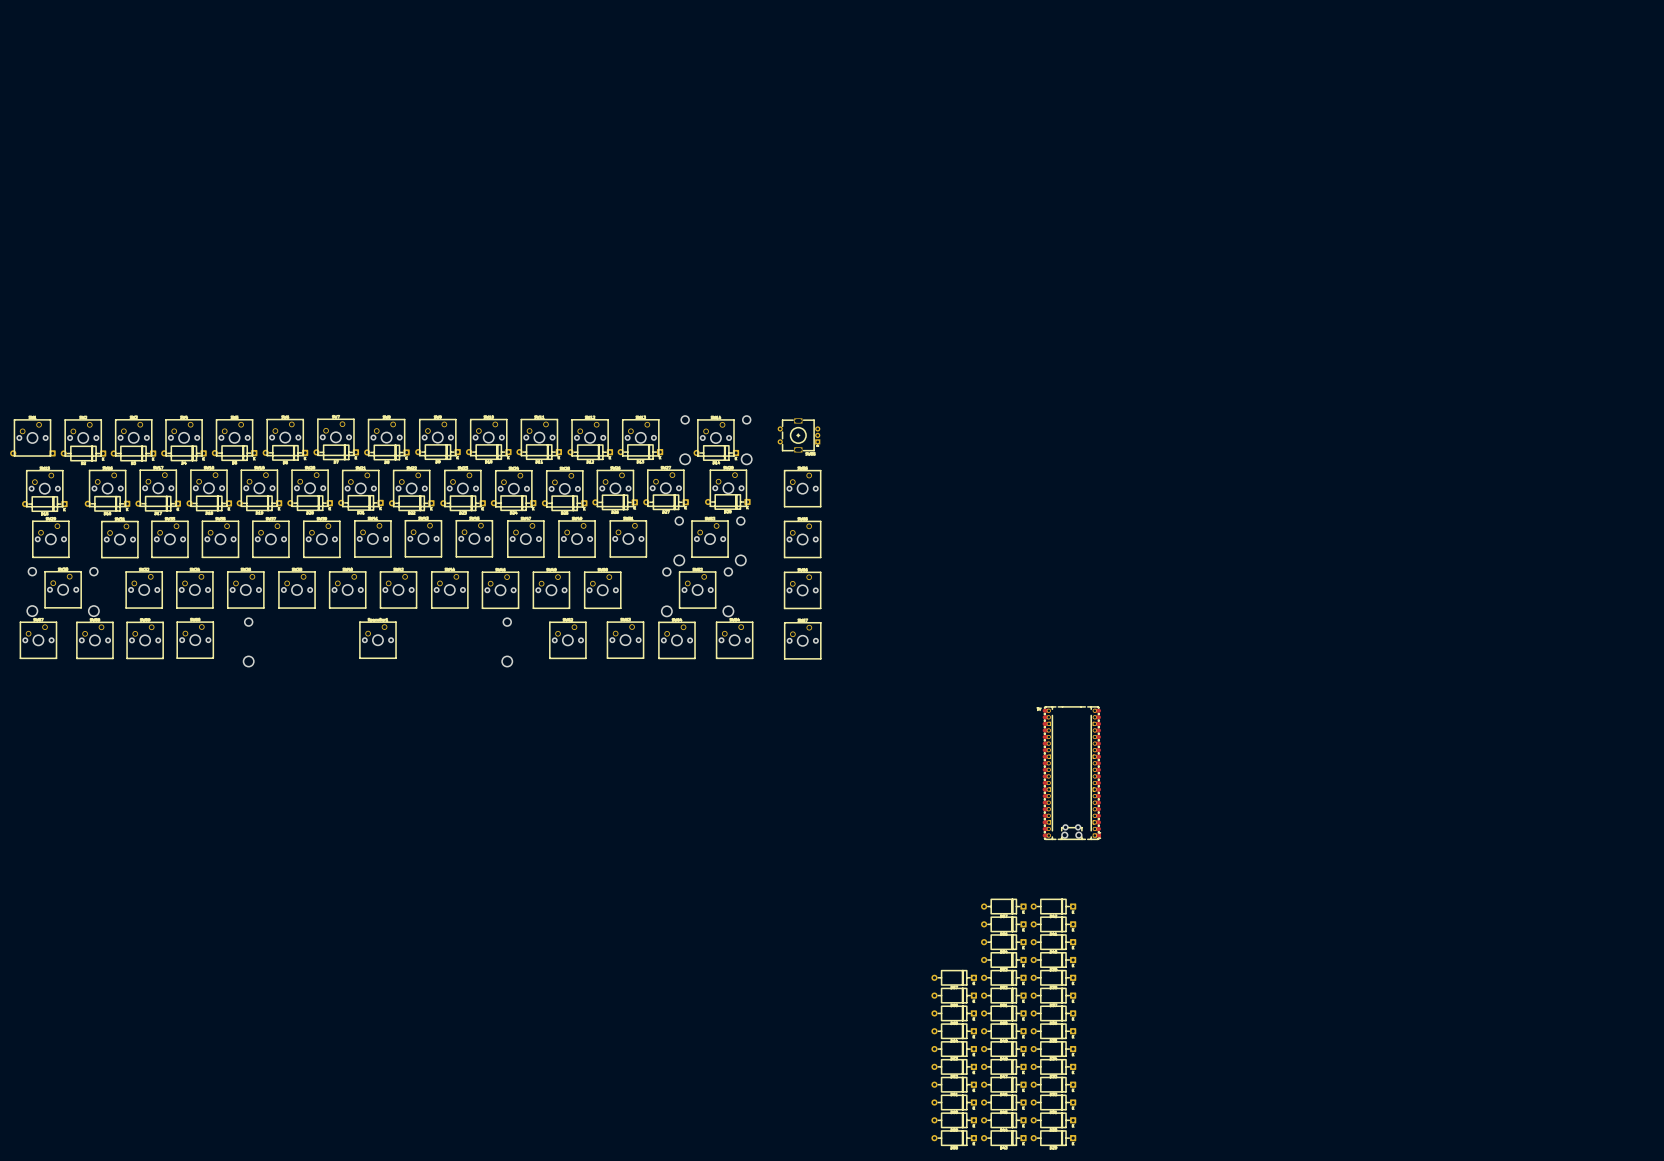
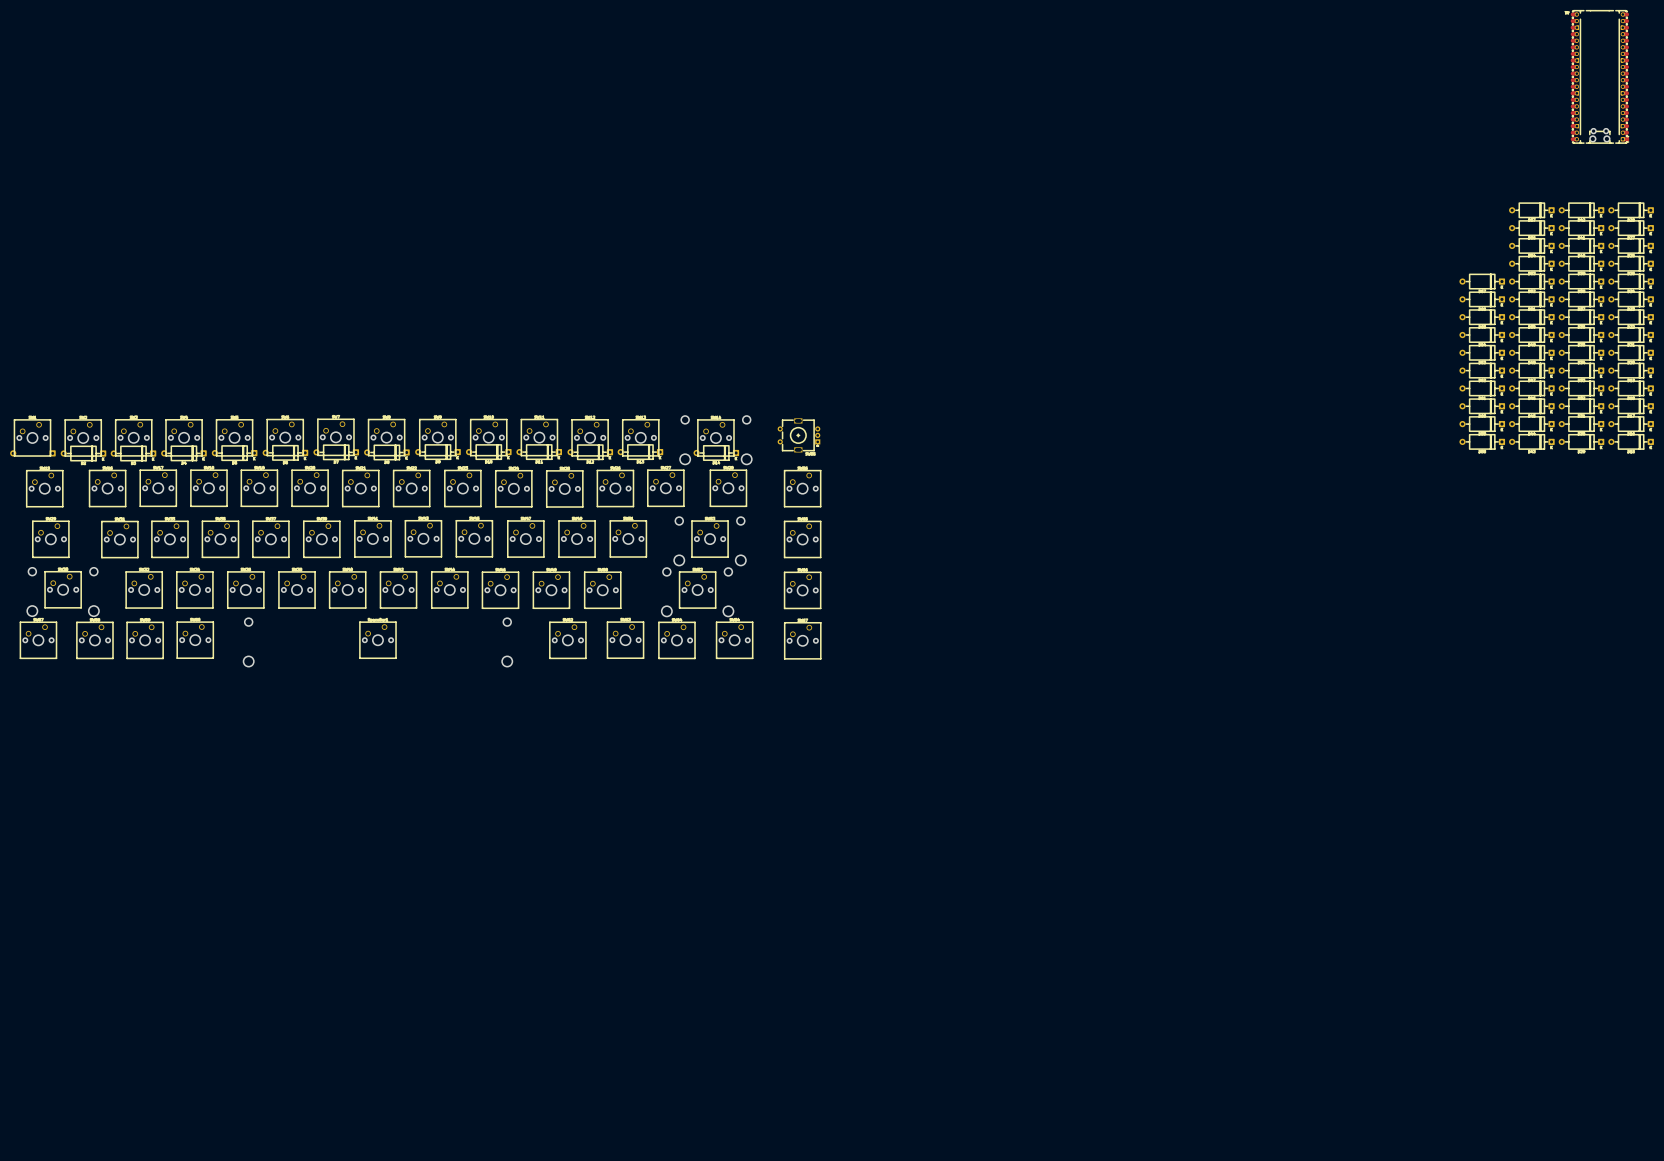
part position: (727, 501) -> (1631, 210)
part position: (360, 502) -> (1631, 335)
part position: (615, 502) -> (1631, 245)
part position: (666, 502) -> (1631, 228)
part position: (107, 503) -> (1631, 424)
part position: (158, 503) -> (1631, 406)
part position: (209, 503) -> (1631, 388)
part position: (259, 503) -> (1631, 370)
part position: (310, 503) -> (1631, 352)
part position: (411, 503) -> (1631, 317)
part position: (463, 503) -> (1631, 299)
part position: (513, 503) -> (1631, 281)
part position: (564, 503) -> (1631, 263)
part position: (44, 504) -> (1631, 441)
part position: (1071, 773) -> (1599, 76)
part position: (1003, 906) -> (1531, 210)
part position: (1053, 906) -> (1581, 210)
part position: (1003, 924) -> (1531, 228)
part position: (1053, 924) -> (1581, 228)
part position: (1003, 942) -> (1531, 245)
part position: (1053, 942) -> (1581, 245)
part position: (1003, 959) -> (1531, 263)
part position: (1053, 959) -> (1581, 263)
part position: (954, 977) -> (1482, 281)
part position: (1003, 977) -> (1531, 281)
part position: (1053, 977) -> (1581, 281)
part position: (954, 995) -> (1482, 299)
part position: (1003, 995) -> (1531, 299)
part position: (1053, 995) -> (1581, 299)
part position: (954, 1013) -> (1482, 317)
part position: (1003, 1013) -> (1531, 317)
part position: (1053, 1013) -> (1581, 317)
part position: (954, 1031) -> (1482, 335)
part position: (1003, 1031) -> (1531, 335)
part position: (1053, 1031) -> (1581, 335)
part position: (954, 1049) -> (1482, 352)
part position: (1003, 1049) -> (1531, 352)
part position: (1053, 1049) -> (1581, 352)
part position: (954, 1066) -> (1482, 370)
part position: (1003, 1066) -> (1531, 370)
part position: (1053, 1066) -> (1581, 370)
part position: (954, 1084) -> (1482, 388)
part position: (1003, 1084) -> (1531, 388)
part position: (1053, 1084) -> (1581, 388)
part position: (954, 1102) -> (1482, 406)
part position: (1003, 1102) -> (1531, 406)
part position: (1053, 1102) -> (1581, 406)
part position: (954, 1120) -> (1482, 424)
part position: (1003, 1120) -> (1531, 424)
part position: (1053, 1120) -> (1581, 424)
part position: (954, 1138) -> (1482, 441)
part position: (1003, 1138) -> (1531, 441)
part position: (1053, 1138) -> (1581, 441)

